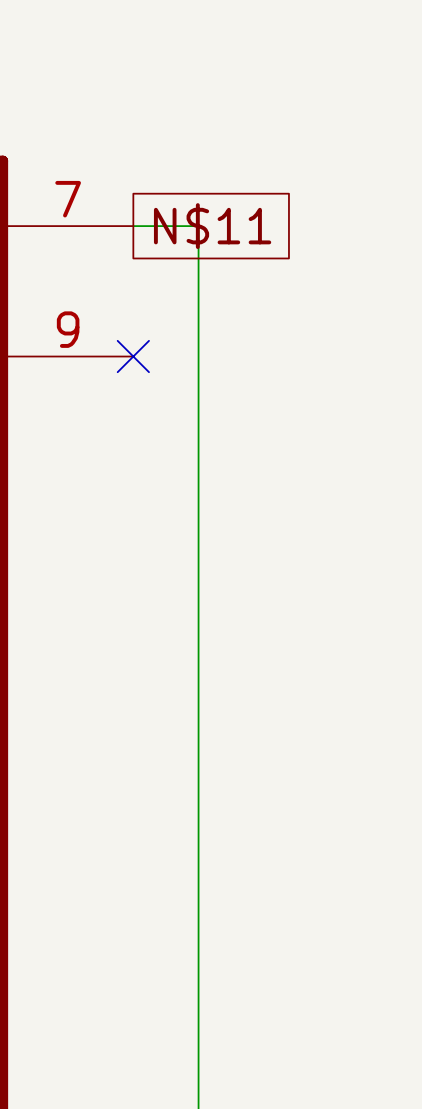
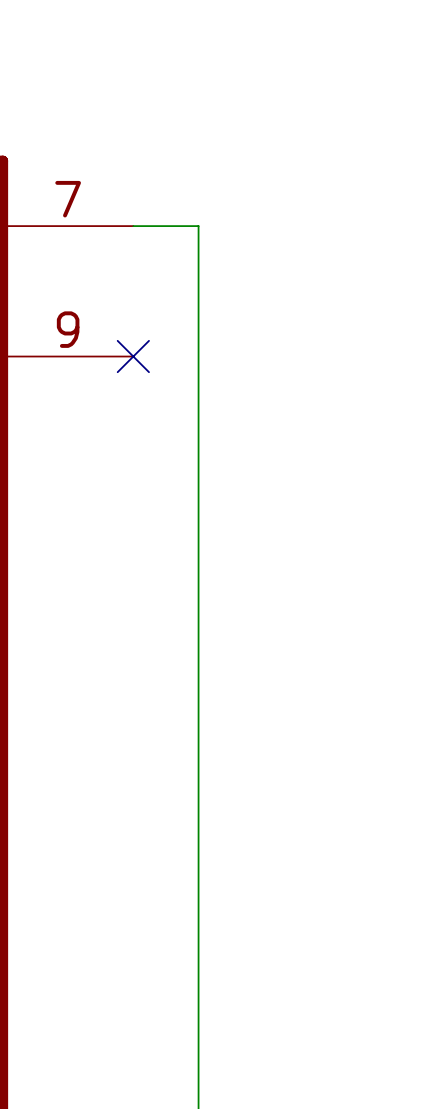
global label: N$11 (212, 226) -> none

